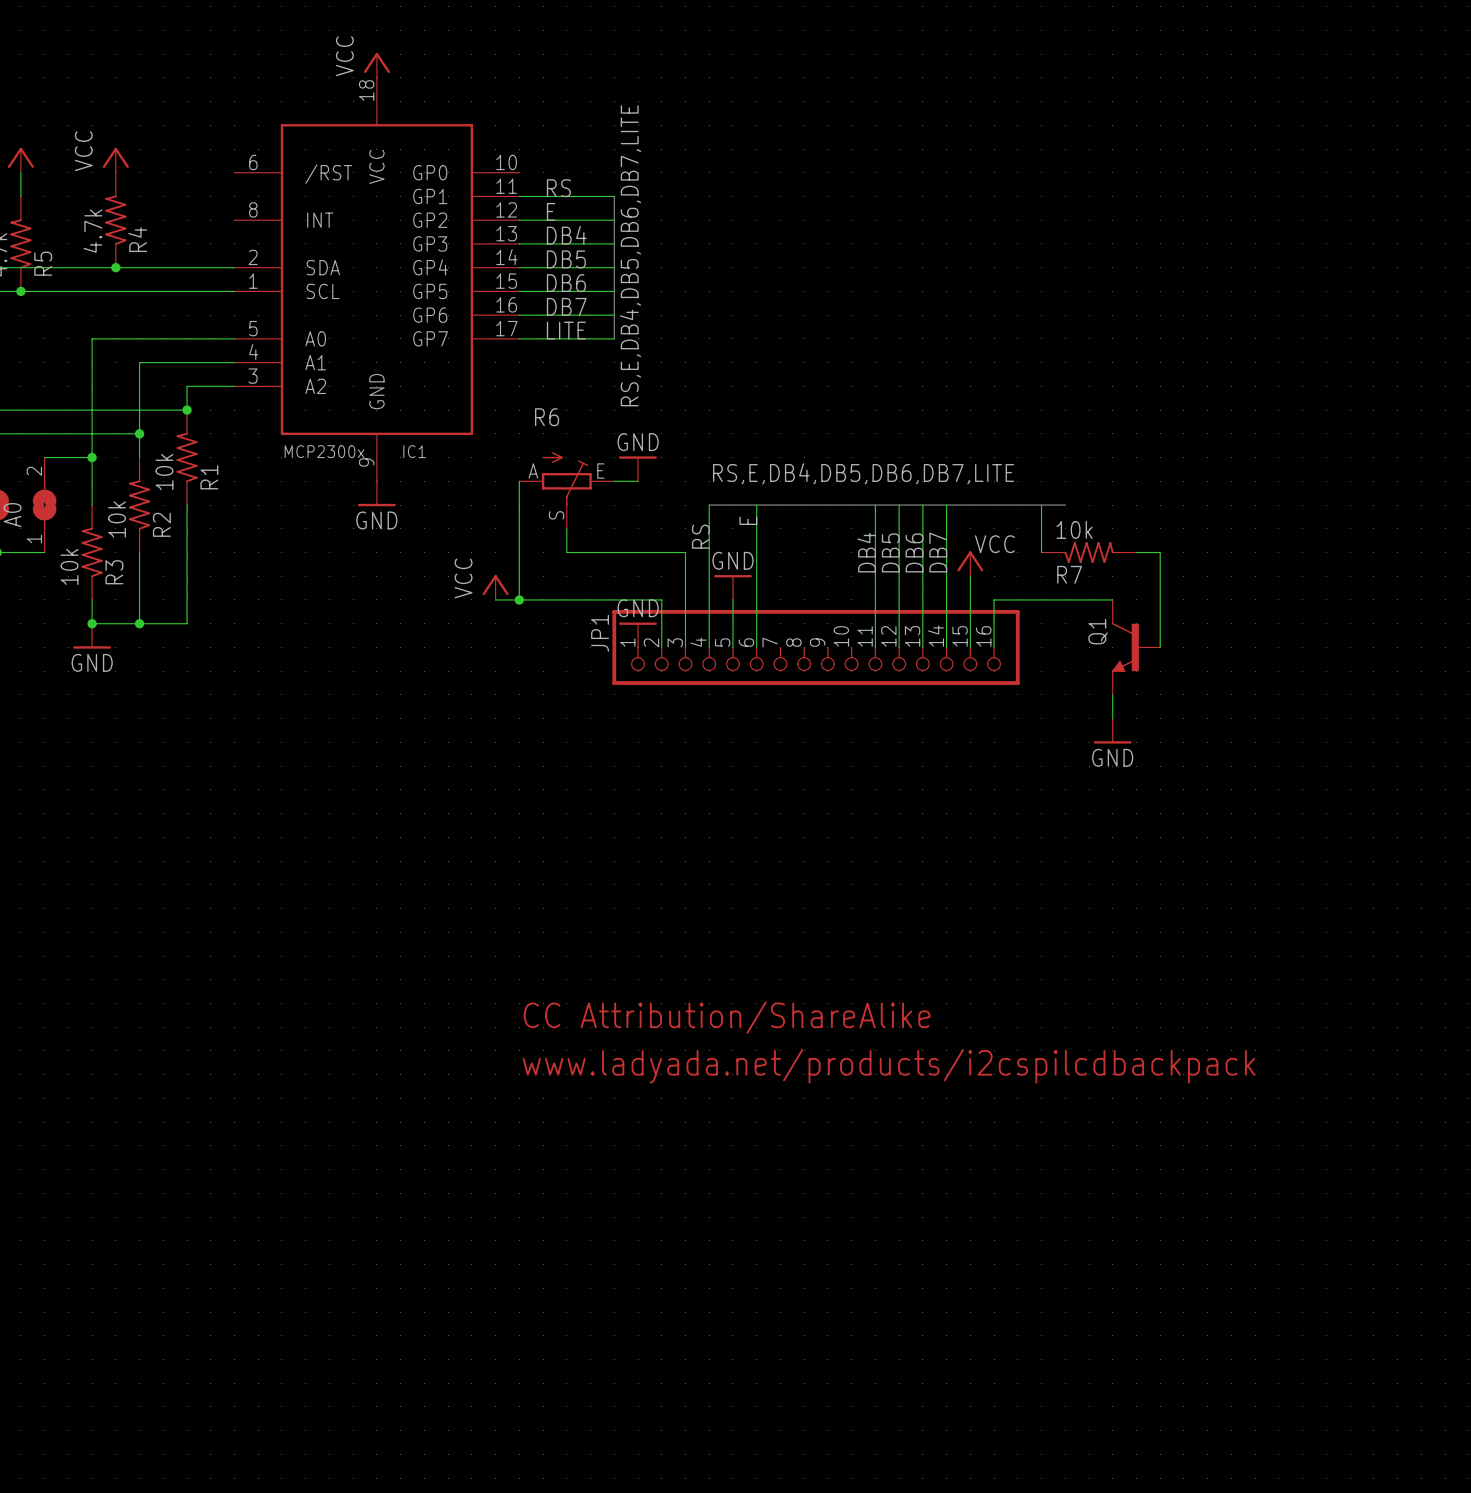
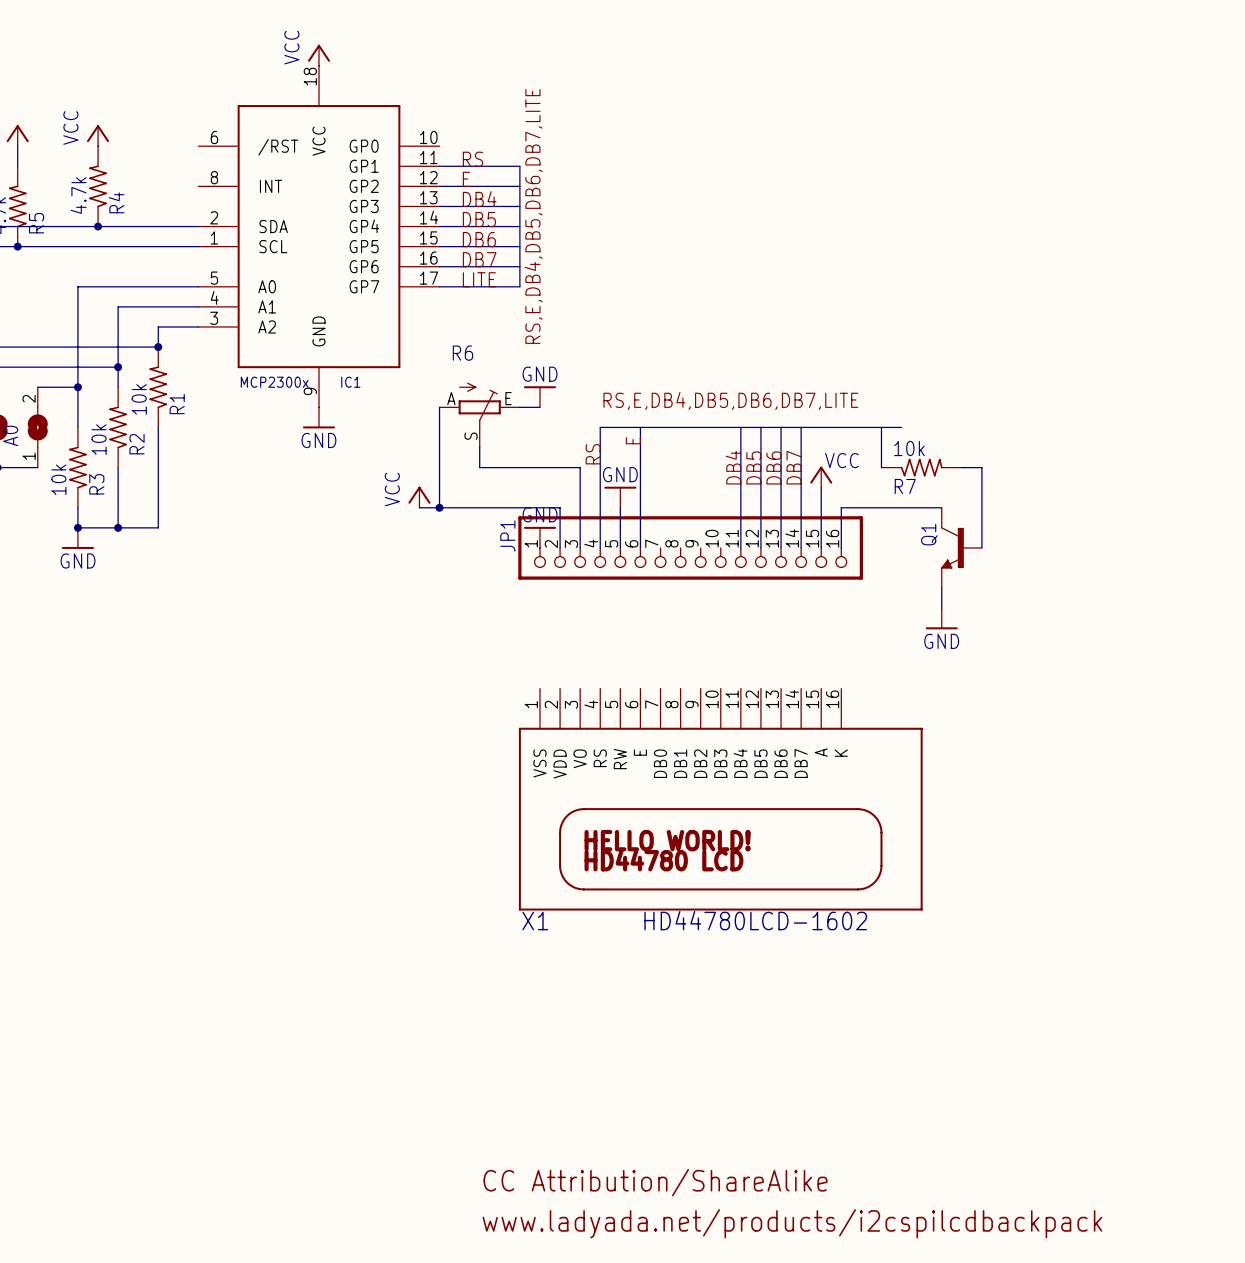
X1: none -> HD44780LCD-1602 (720, 799)
text: CC Attribution/ShareAlike (727, 1017) -> none
text: www.ladyada.net/products/i2cspilcdbackpack (888, 1066) -> none
text: none -> CC Attribution/ShareAlike (655, 1182)
text: none -> www.ladyada.net/products/i2cspilcdbackpack (792, 1223)

